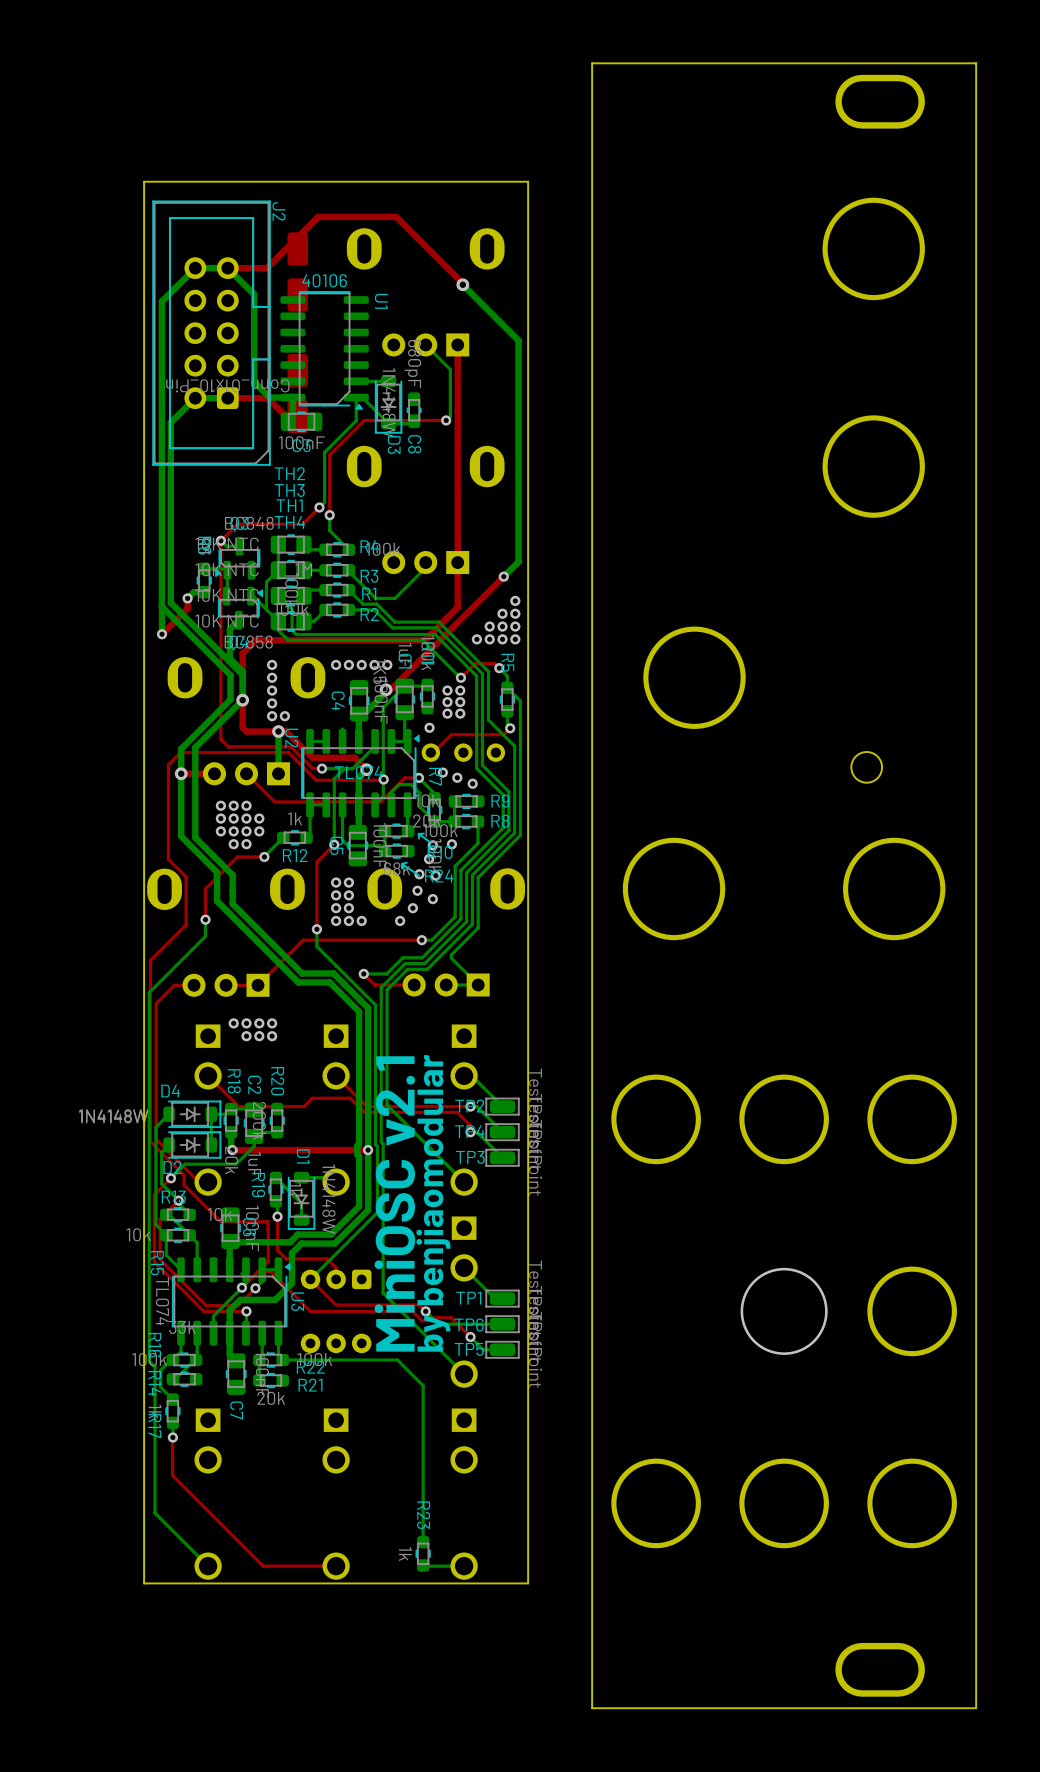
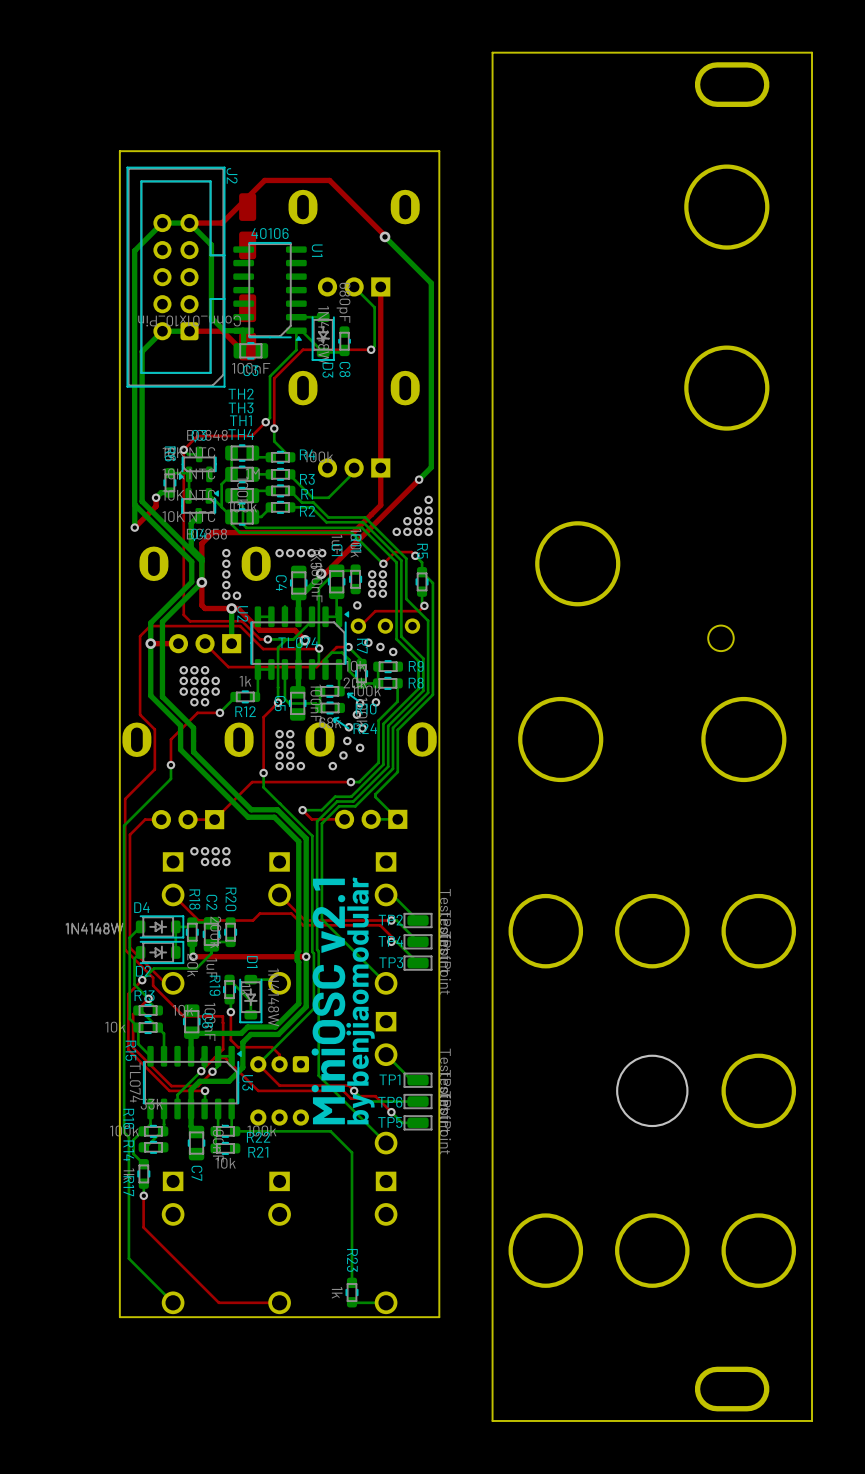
R21 value: 20k (271, 1398) -> 10k (225, 1163)

